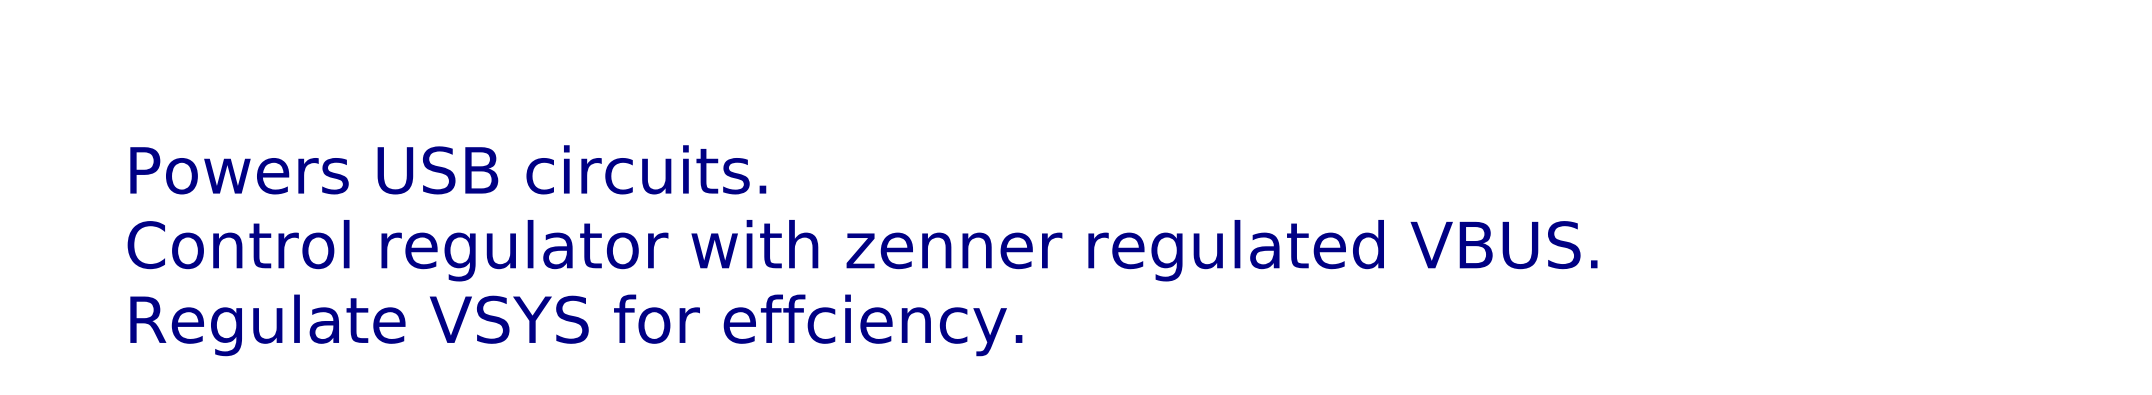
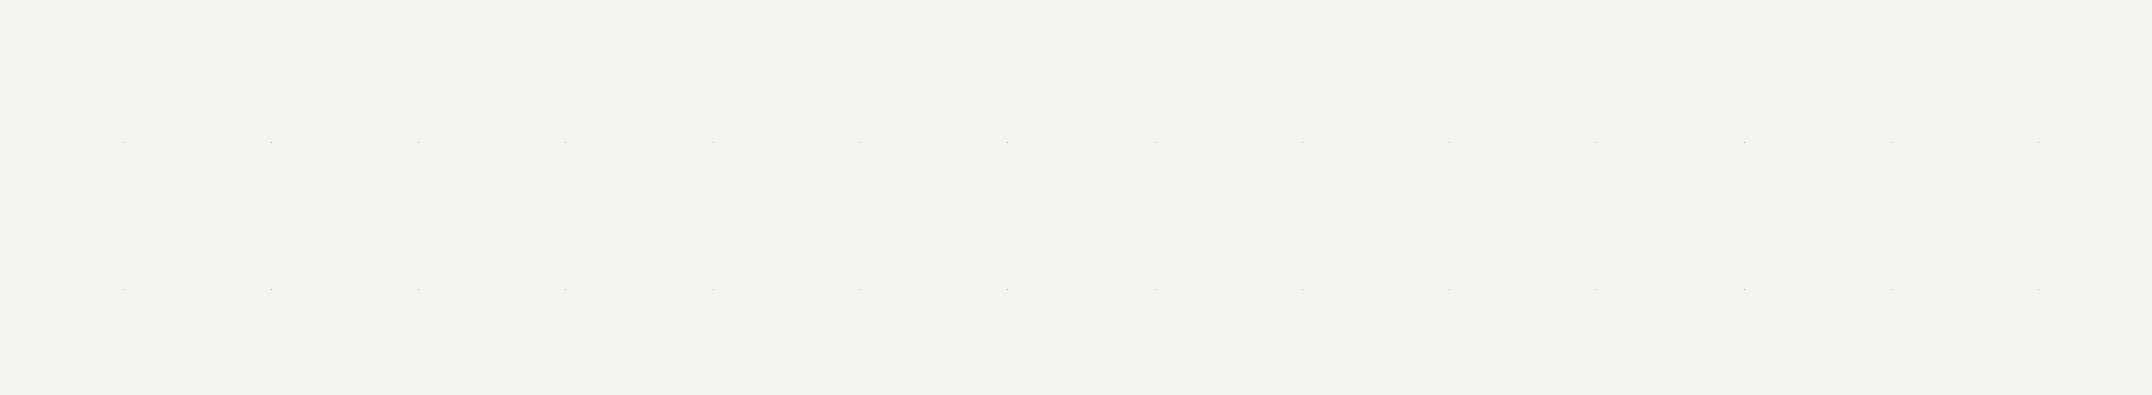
text: Powers USB circuits. (448, 169) -> none
text: Control regulator with zenner regulated VBUS. (862, 250) -> none
text: Regulate VSYS for effciency. (576, 325) -> none

